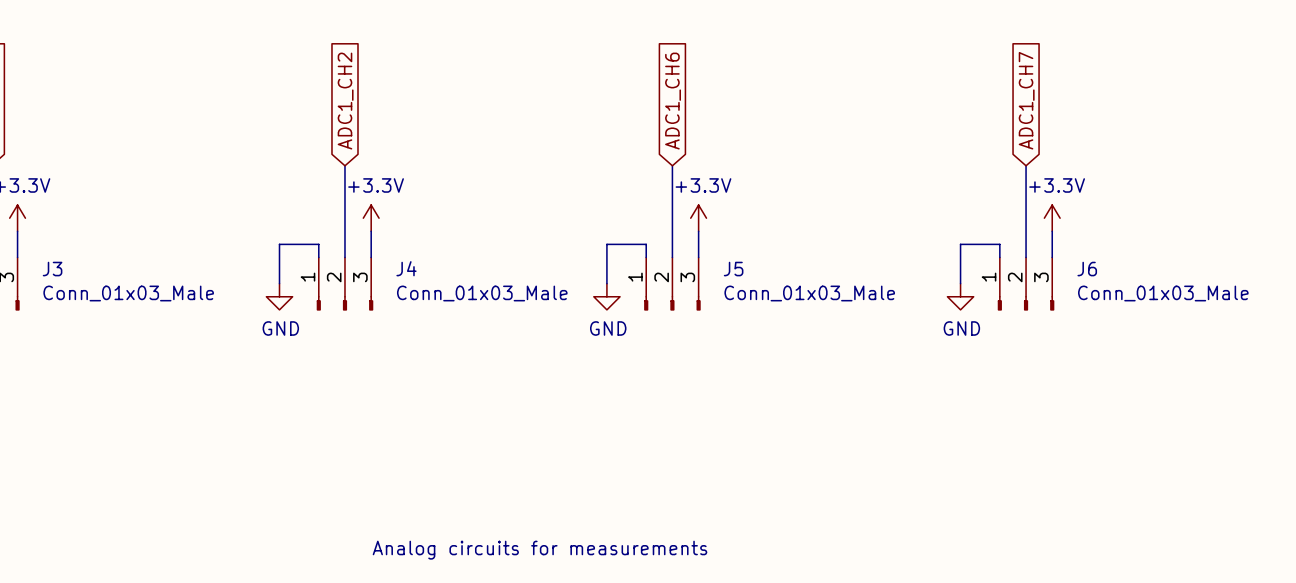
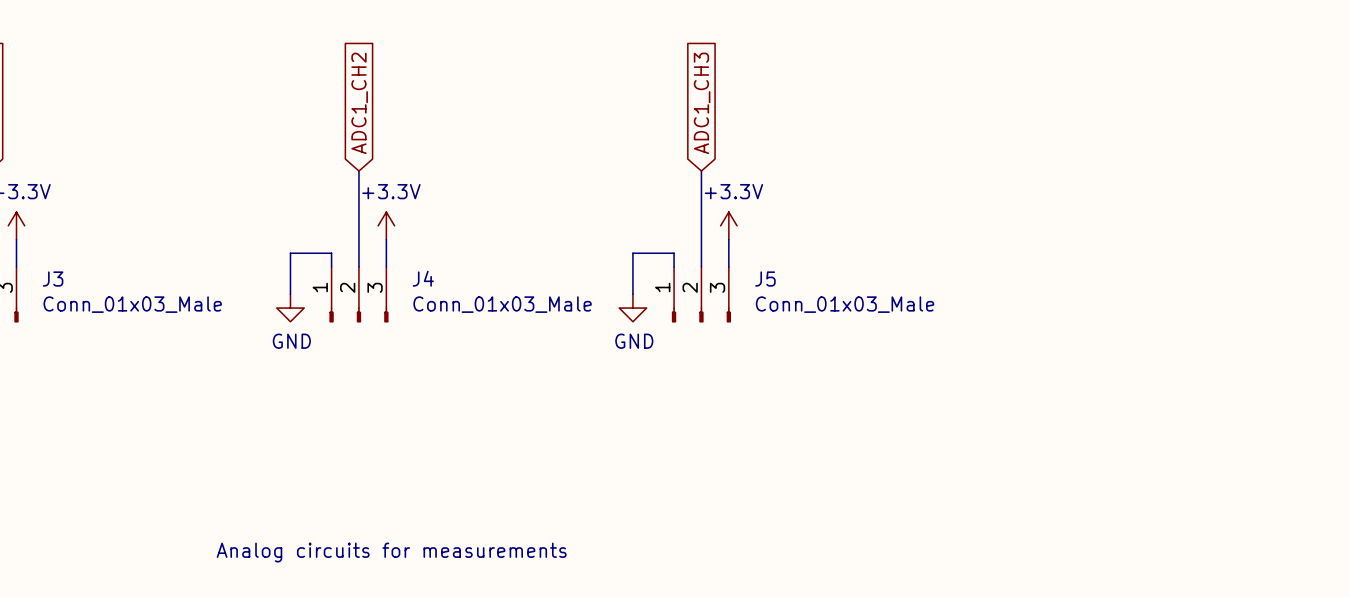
global label: ADC1_CH7 (1026, 100) -> none
global label: ADC1_CH6 (673, 101) -> ADC1_CH3 (702, 103)
wire: (1026, 165) (1026, 257) -> none
power symbol: +3.3V (1052, 218) -> none
wire: (1052, 231) (1052, 257) -> none
wire: (999, 257) (999, 244) (960, 244) (960, 283) -> none
J6: Conn_01x03_Male (1026, 284) -> none
power symbol: GND (960, 296) -> none
text position: Analog circuits for measurements (539, 550) -> Analog circuits for measurements (391, 552)

